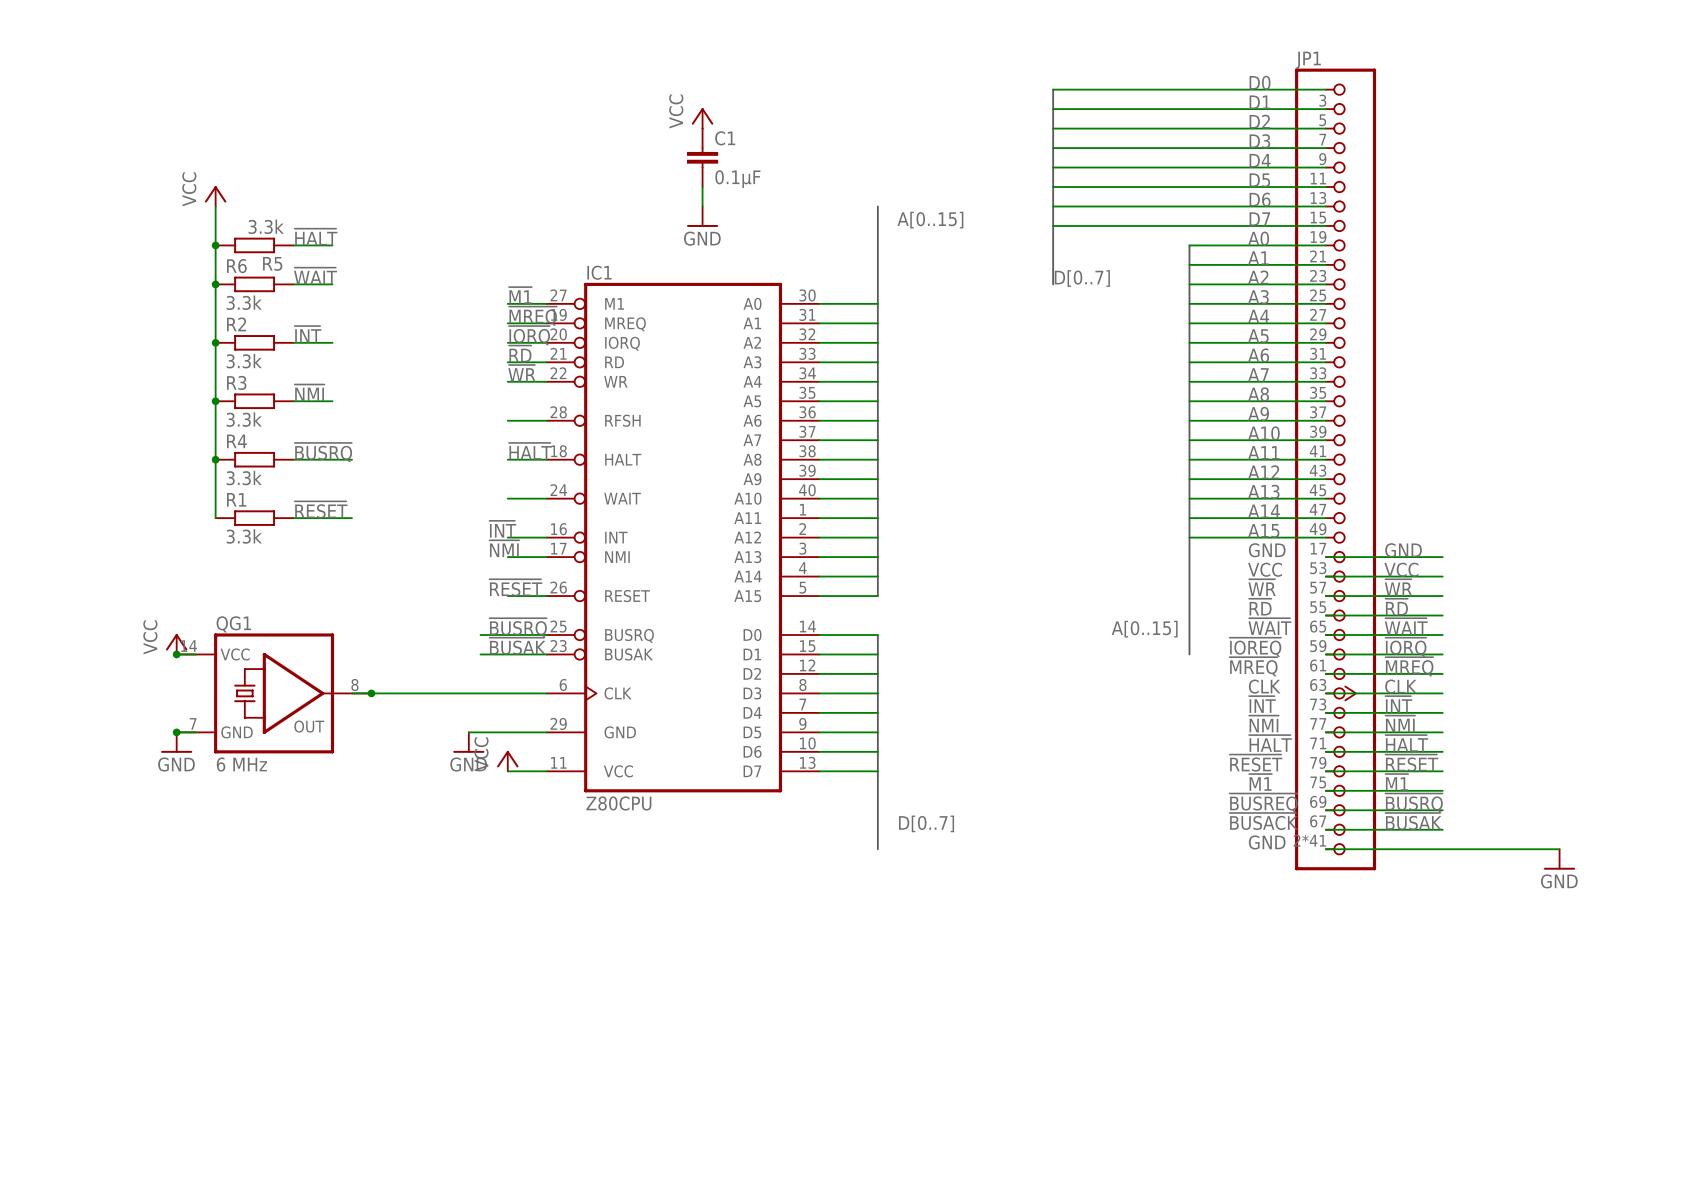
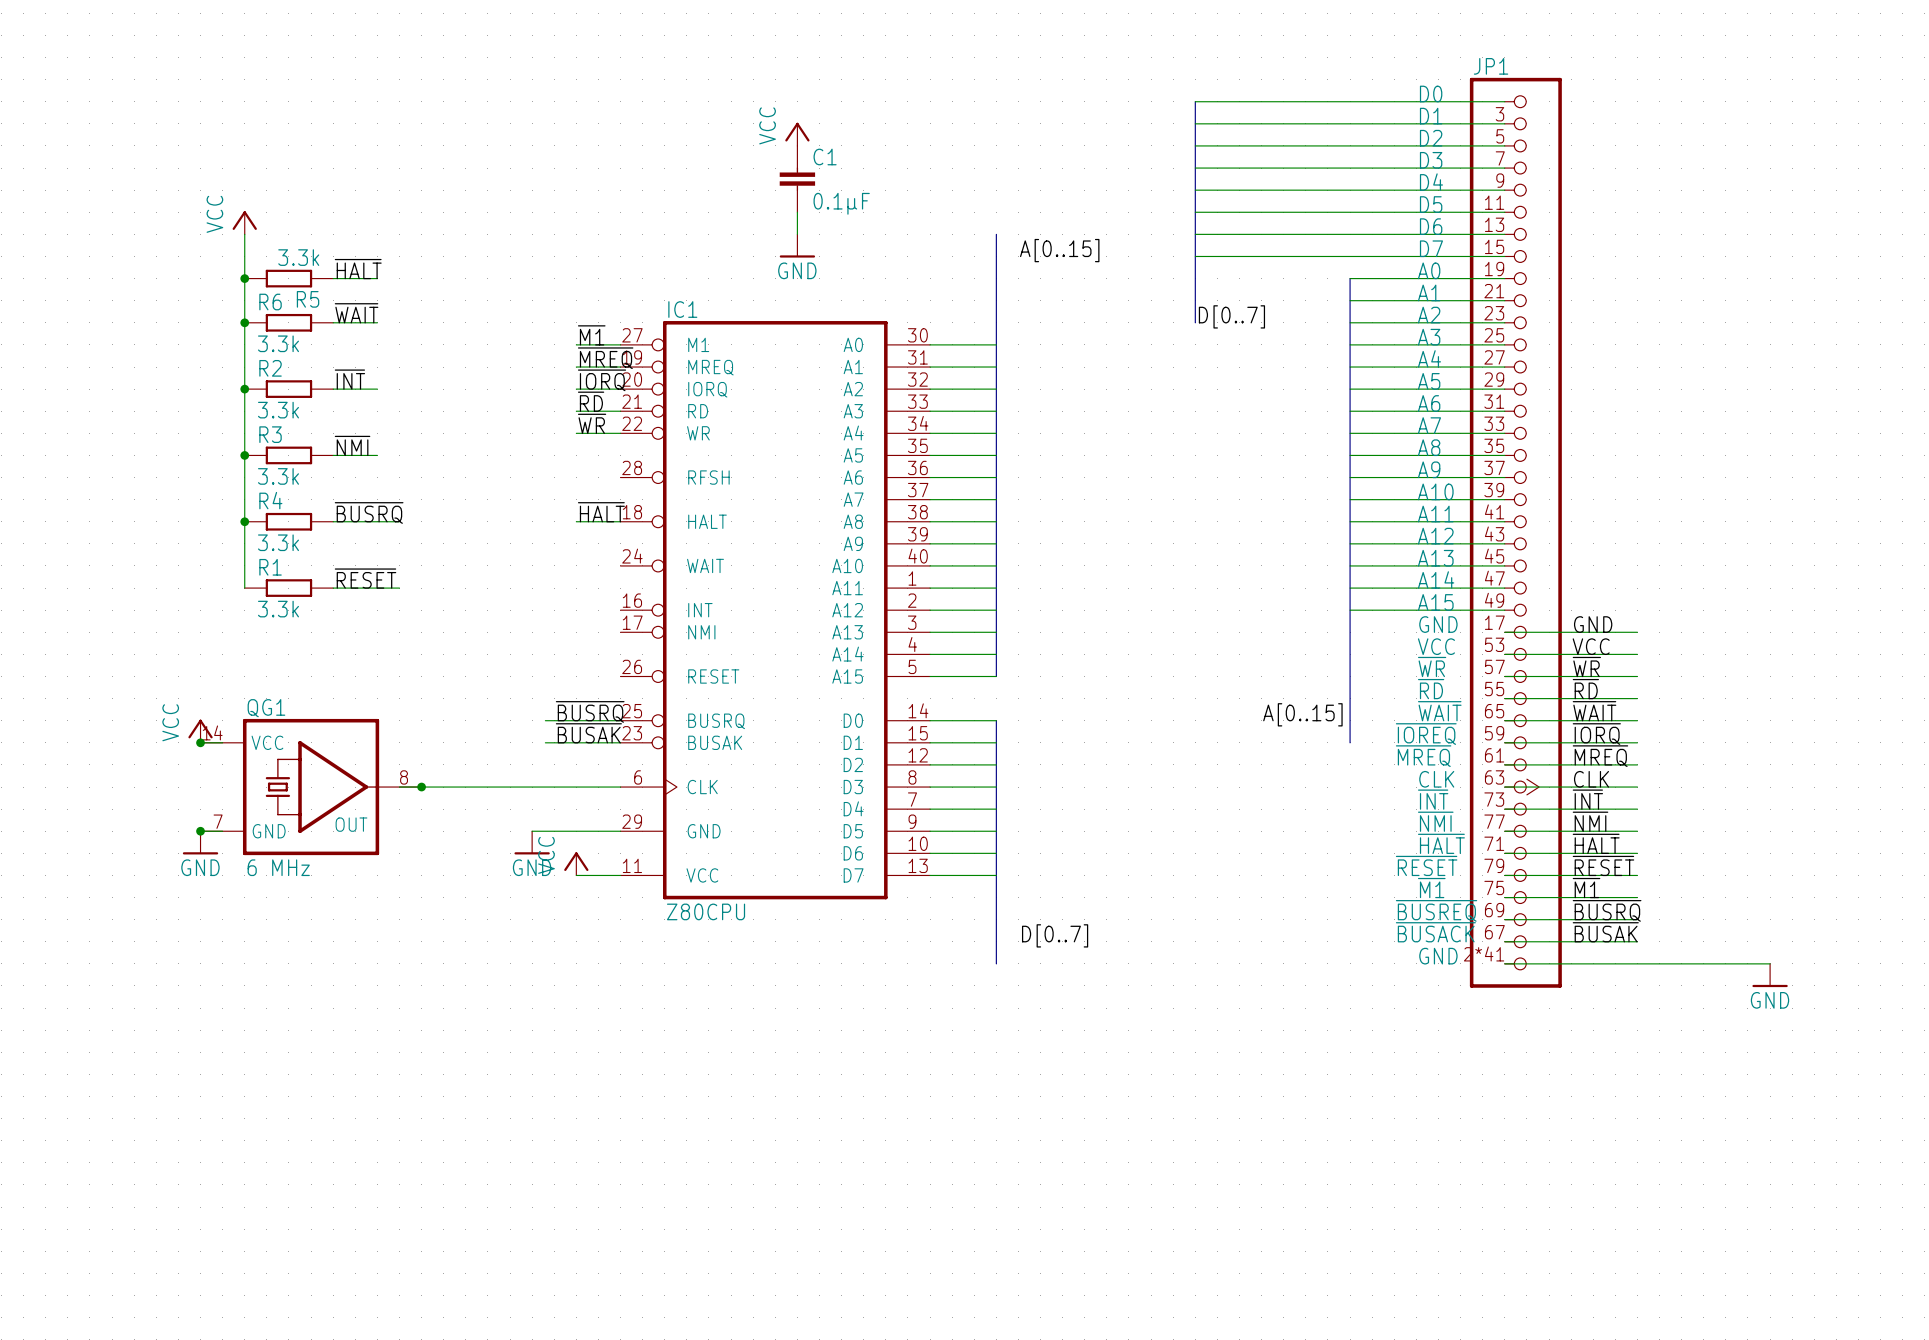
wire: (507, 420) (546, 420) -> none
wire: (507, 498) (546, 498) -> none
label: ~{INT} (502, 529) -> none
wire: (507, 537) (546, 537) -> none
label: ~{NMI} (504, 548) -> none
wire: (507, 557) (546, 557) -> none
label: ~{RESET} (515, 587) -> none
wire: (507, 596) (546, 596) -> none

